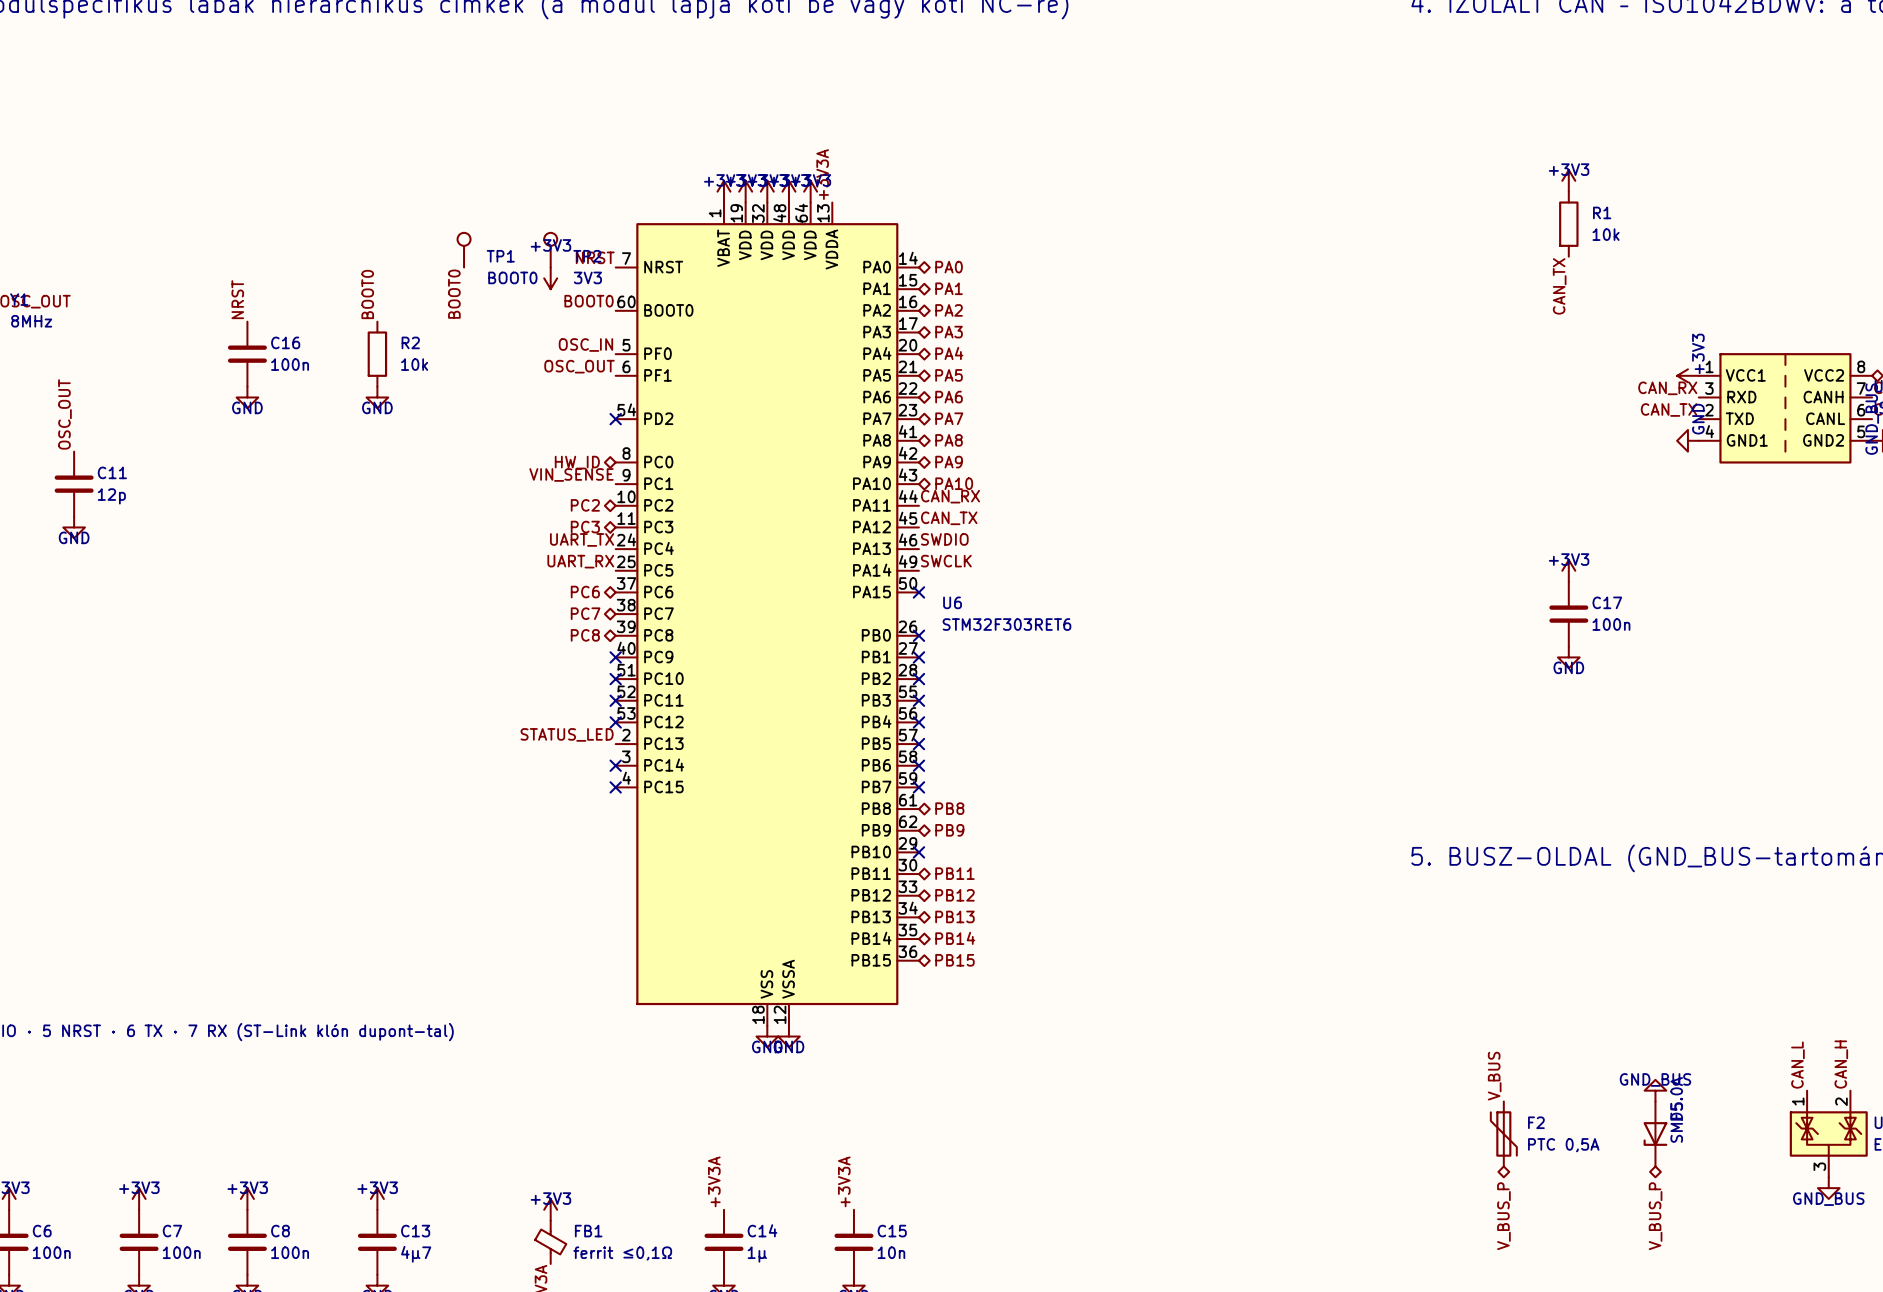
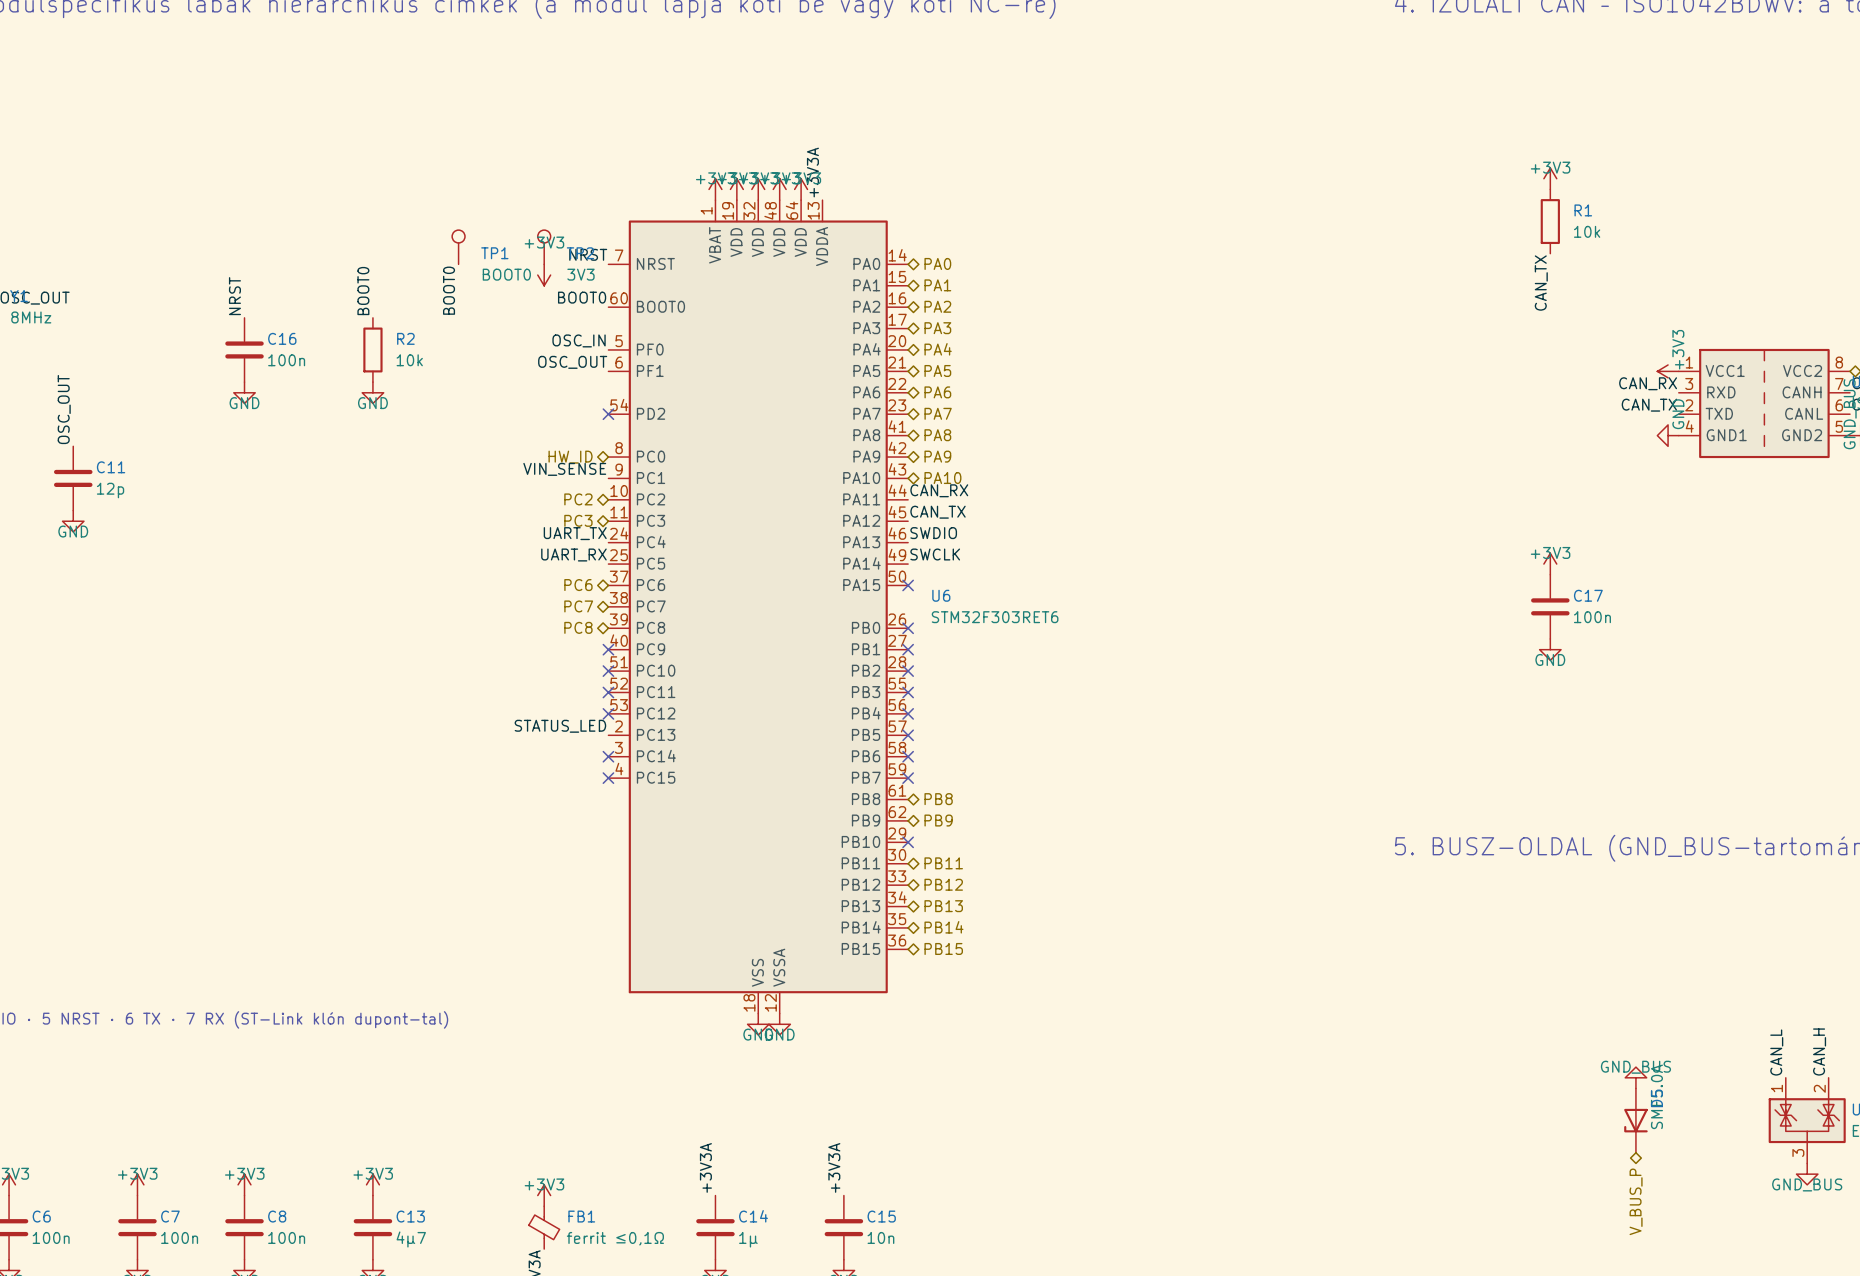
label: V_BUS (1494, 1076) -> none
F2: PTC 0,5A (1503, 1133) -> none
hierarchical label: V_BUS_P (1503, 1216) -> none

